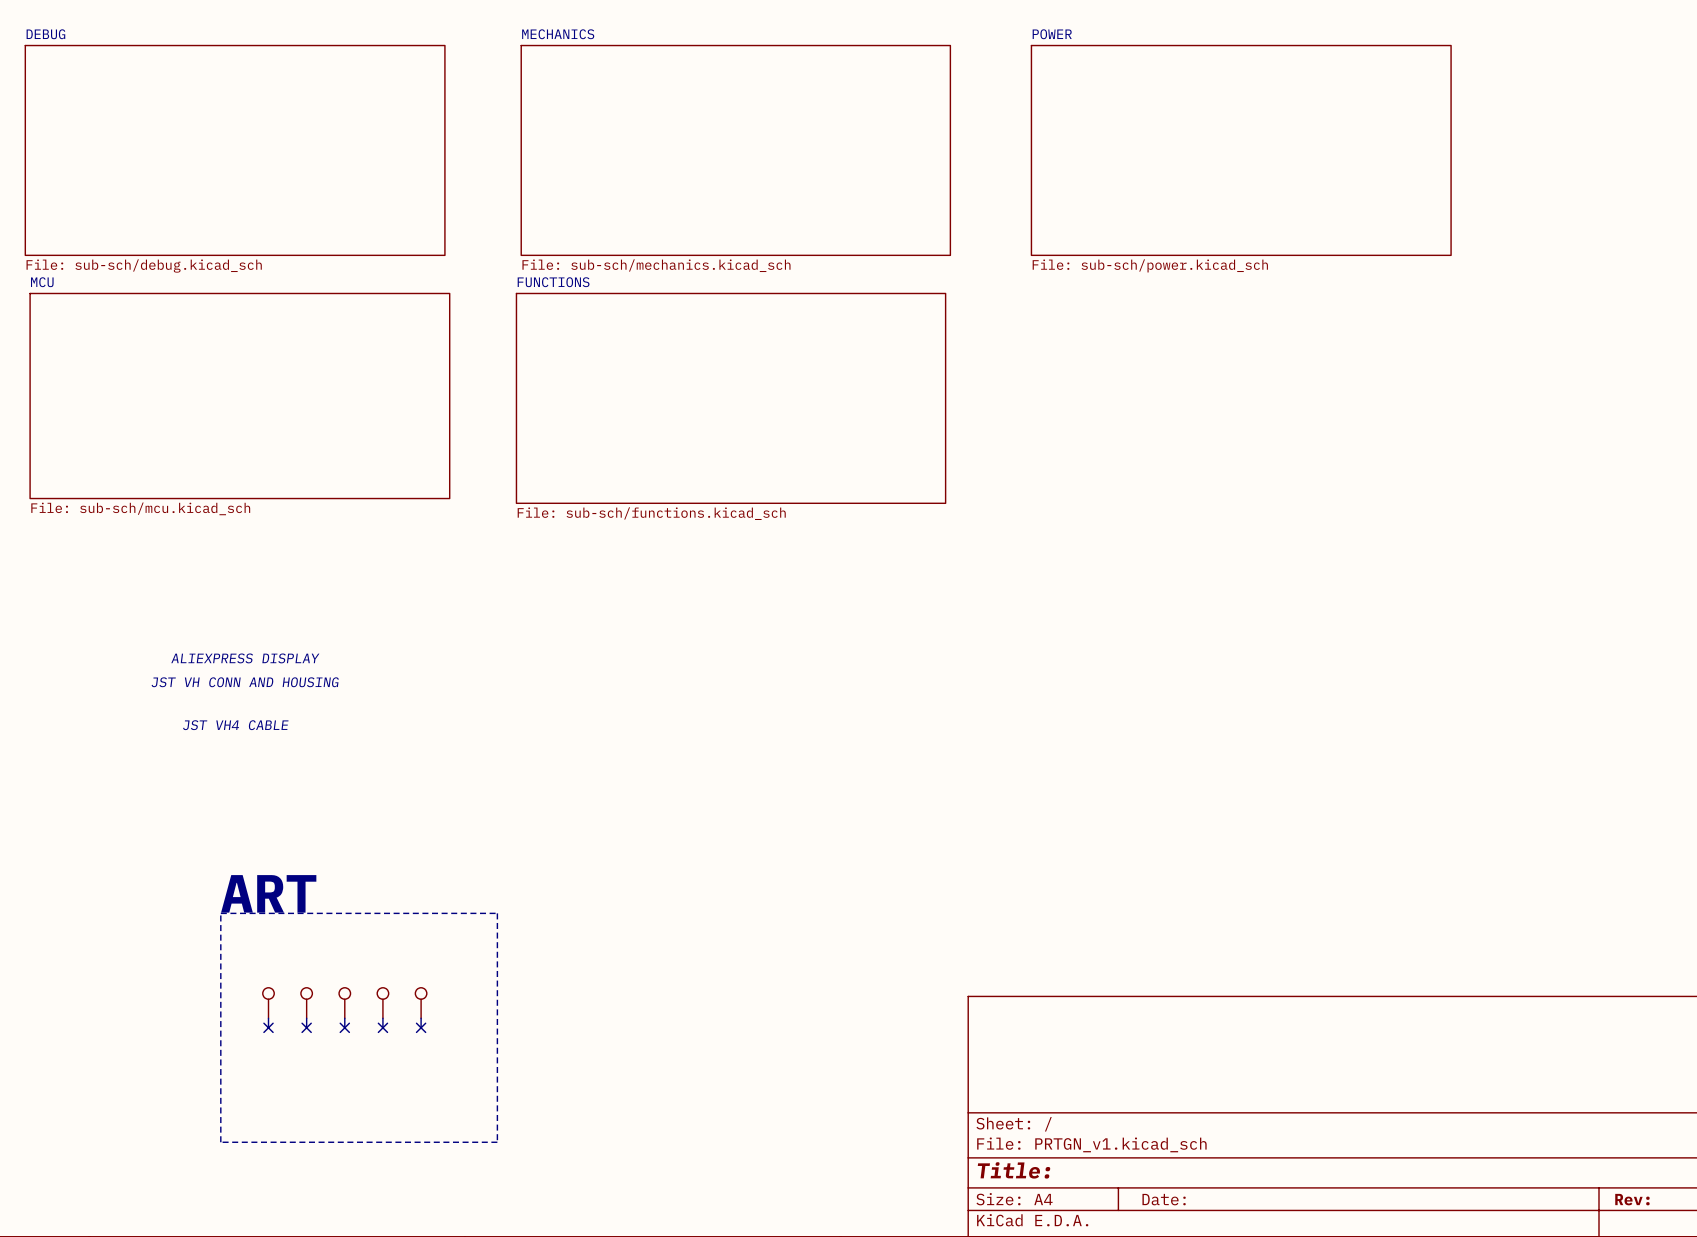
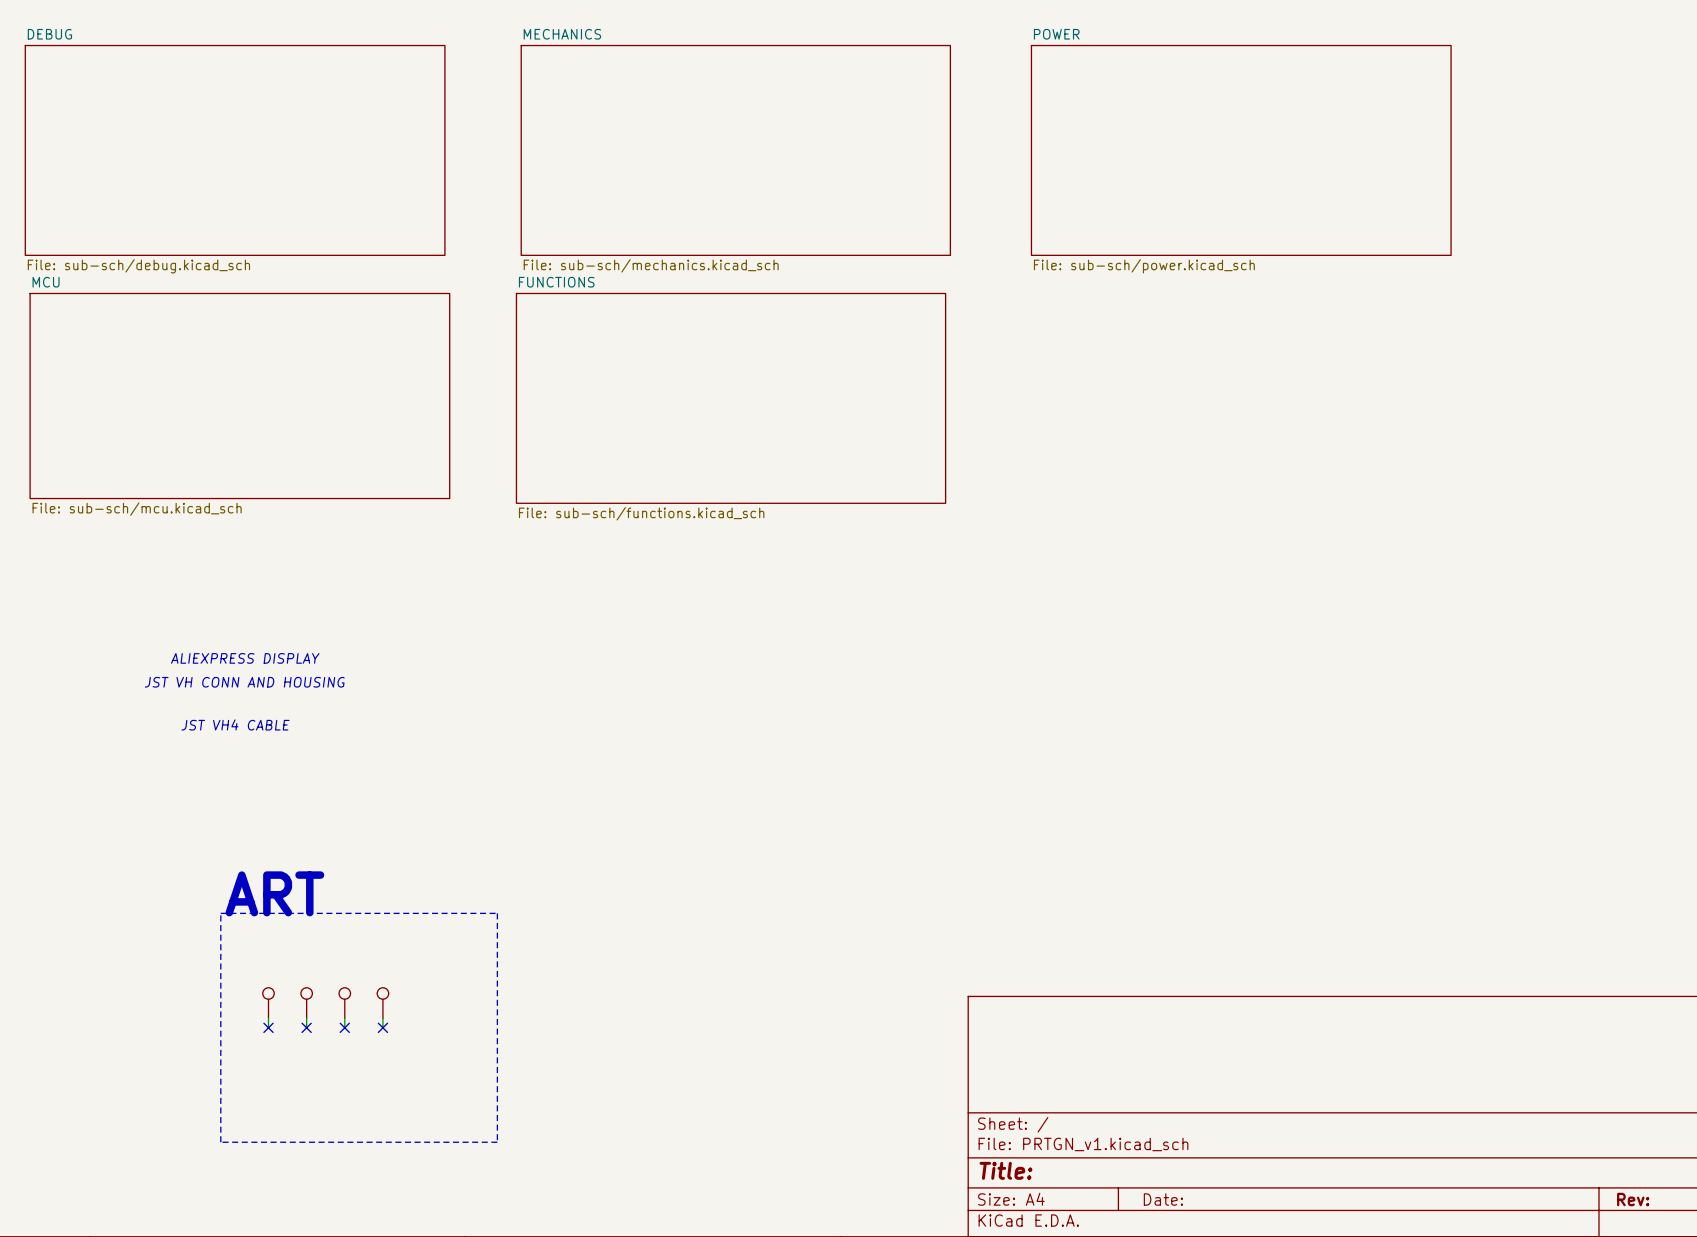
part: (421, 1003) -> none
wire: (421, 1018) (421, 1027) -> none
no-connect mark: (421, 1027) -> none

